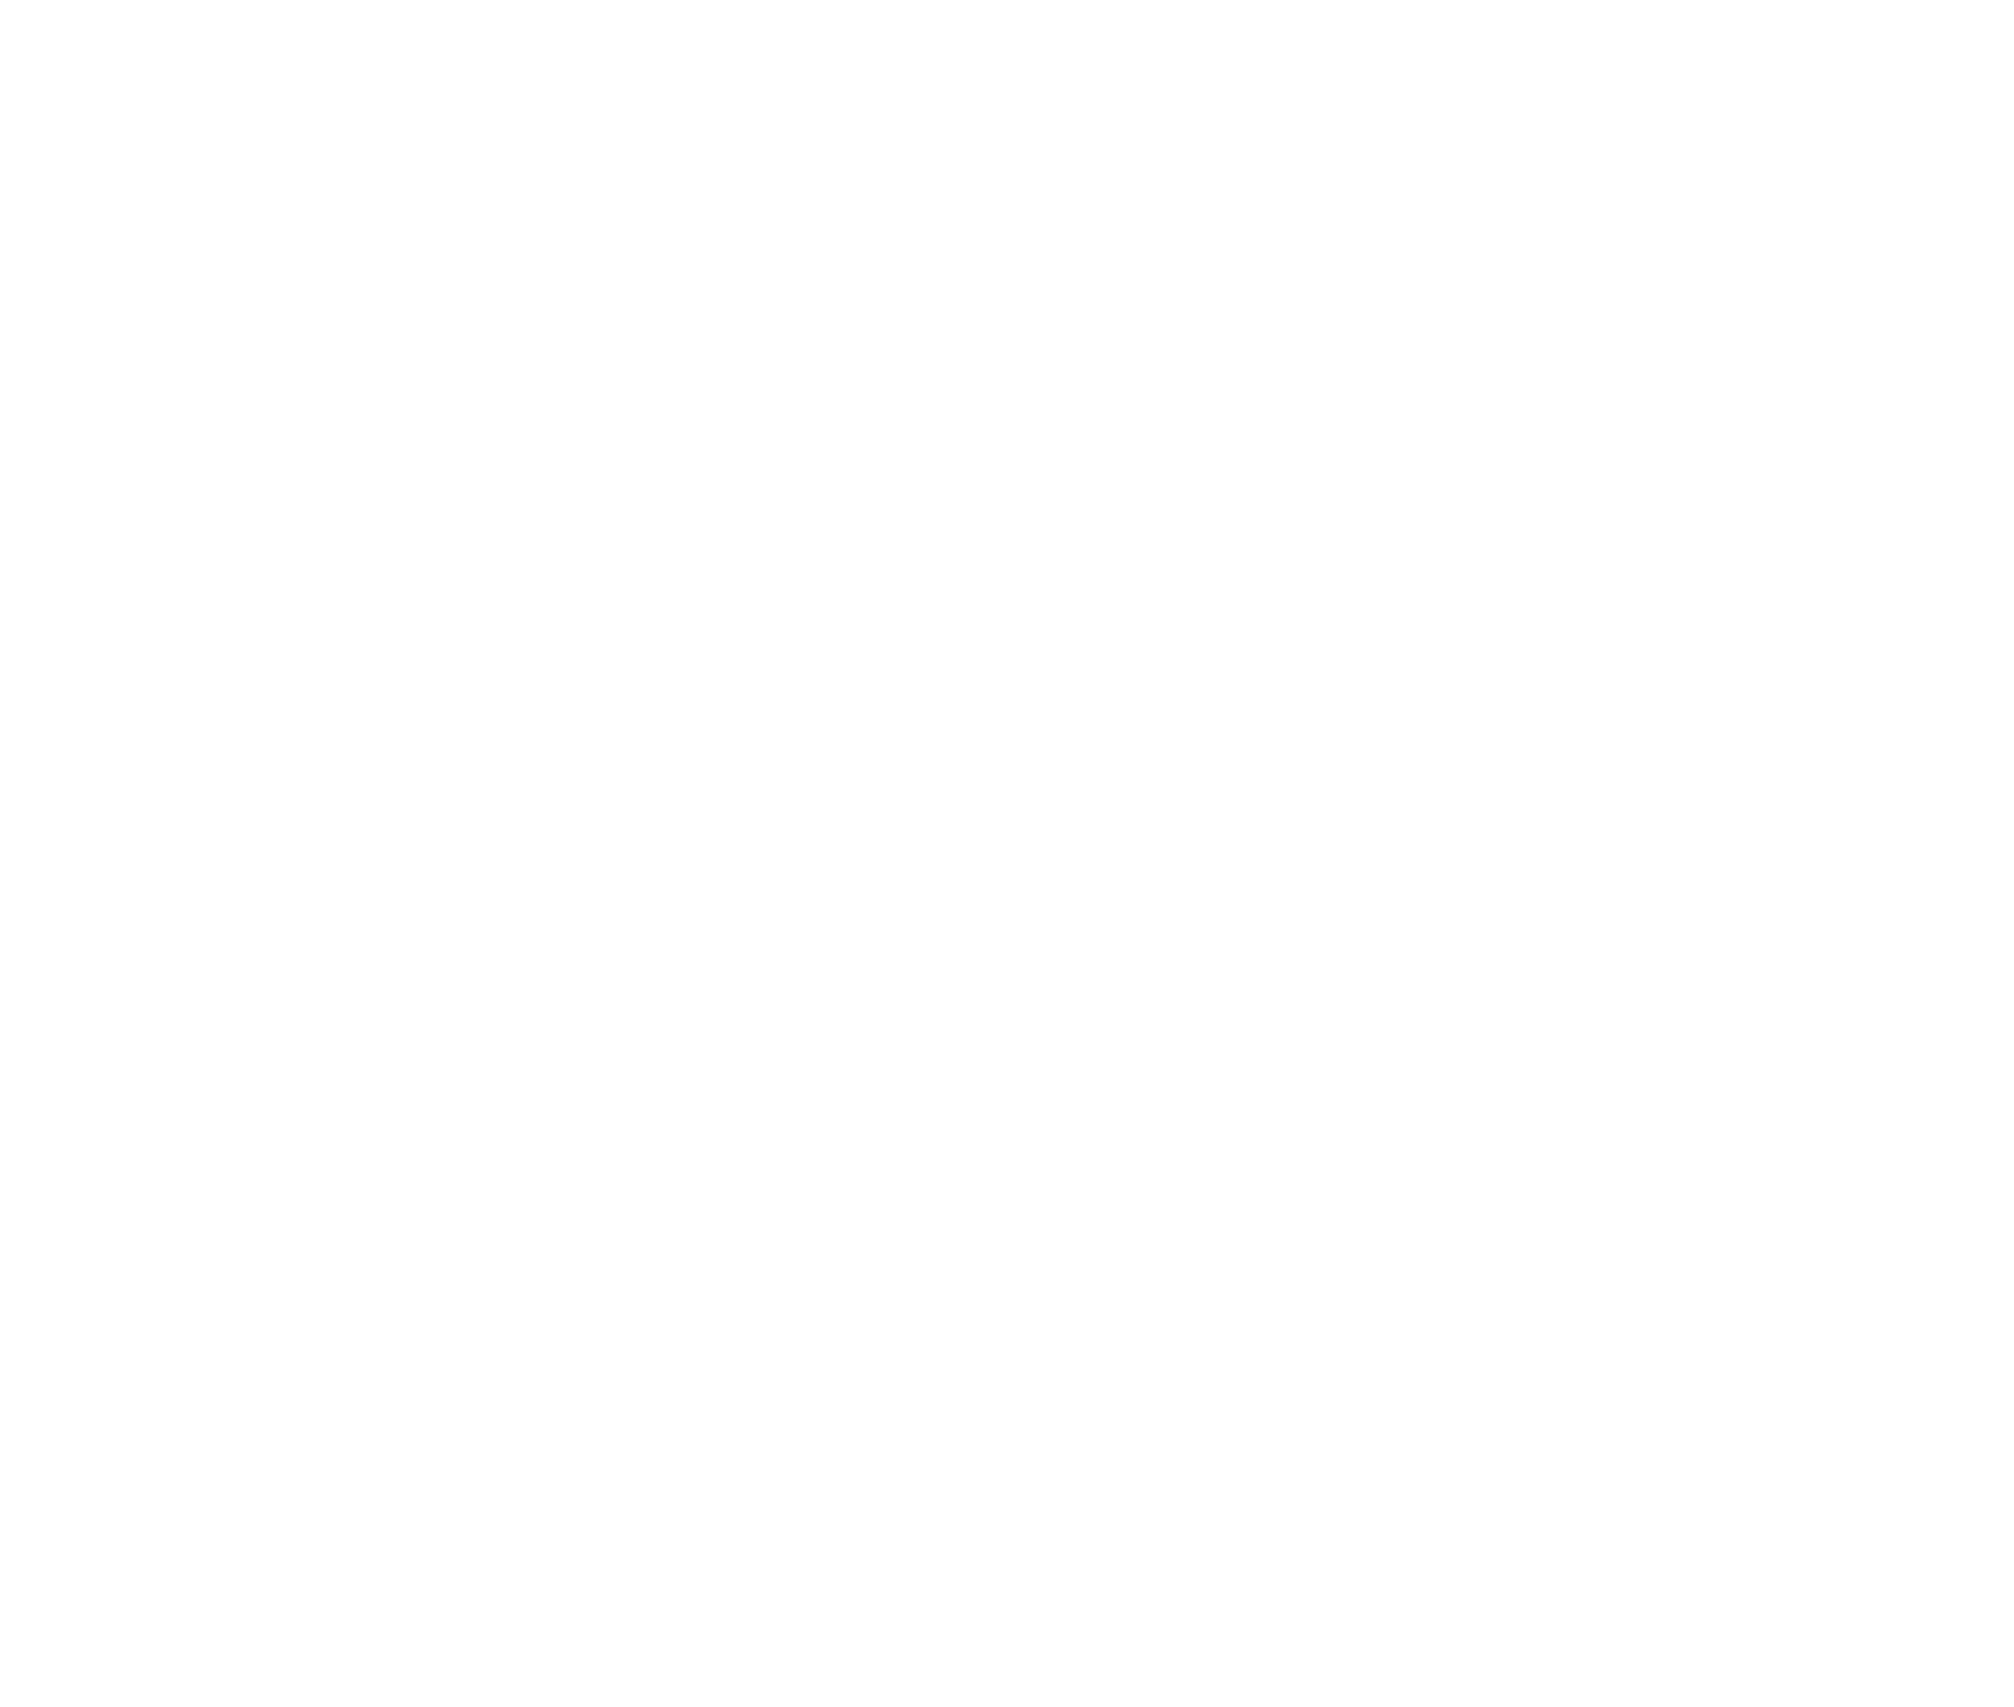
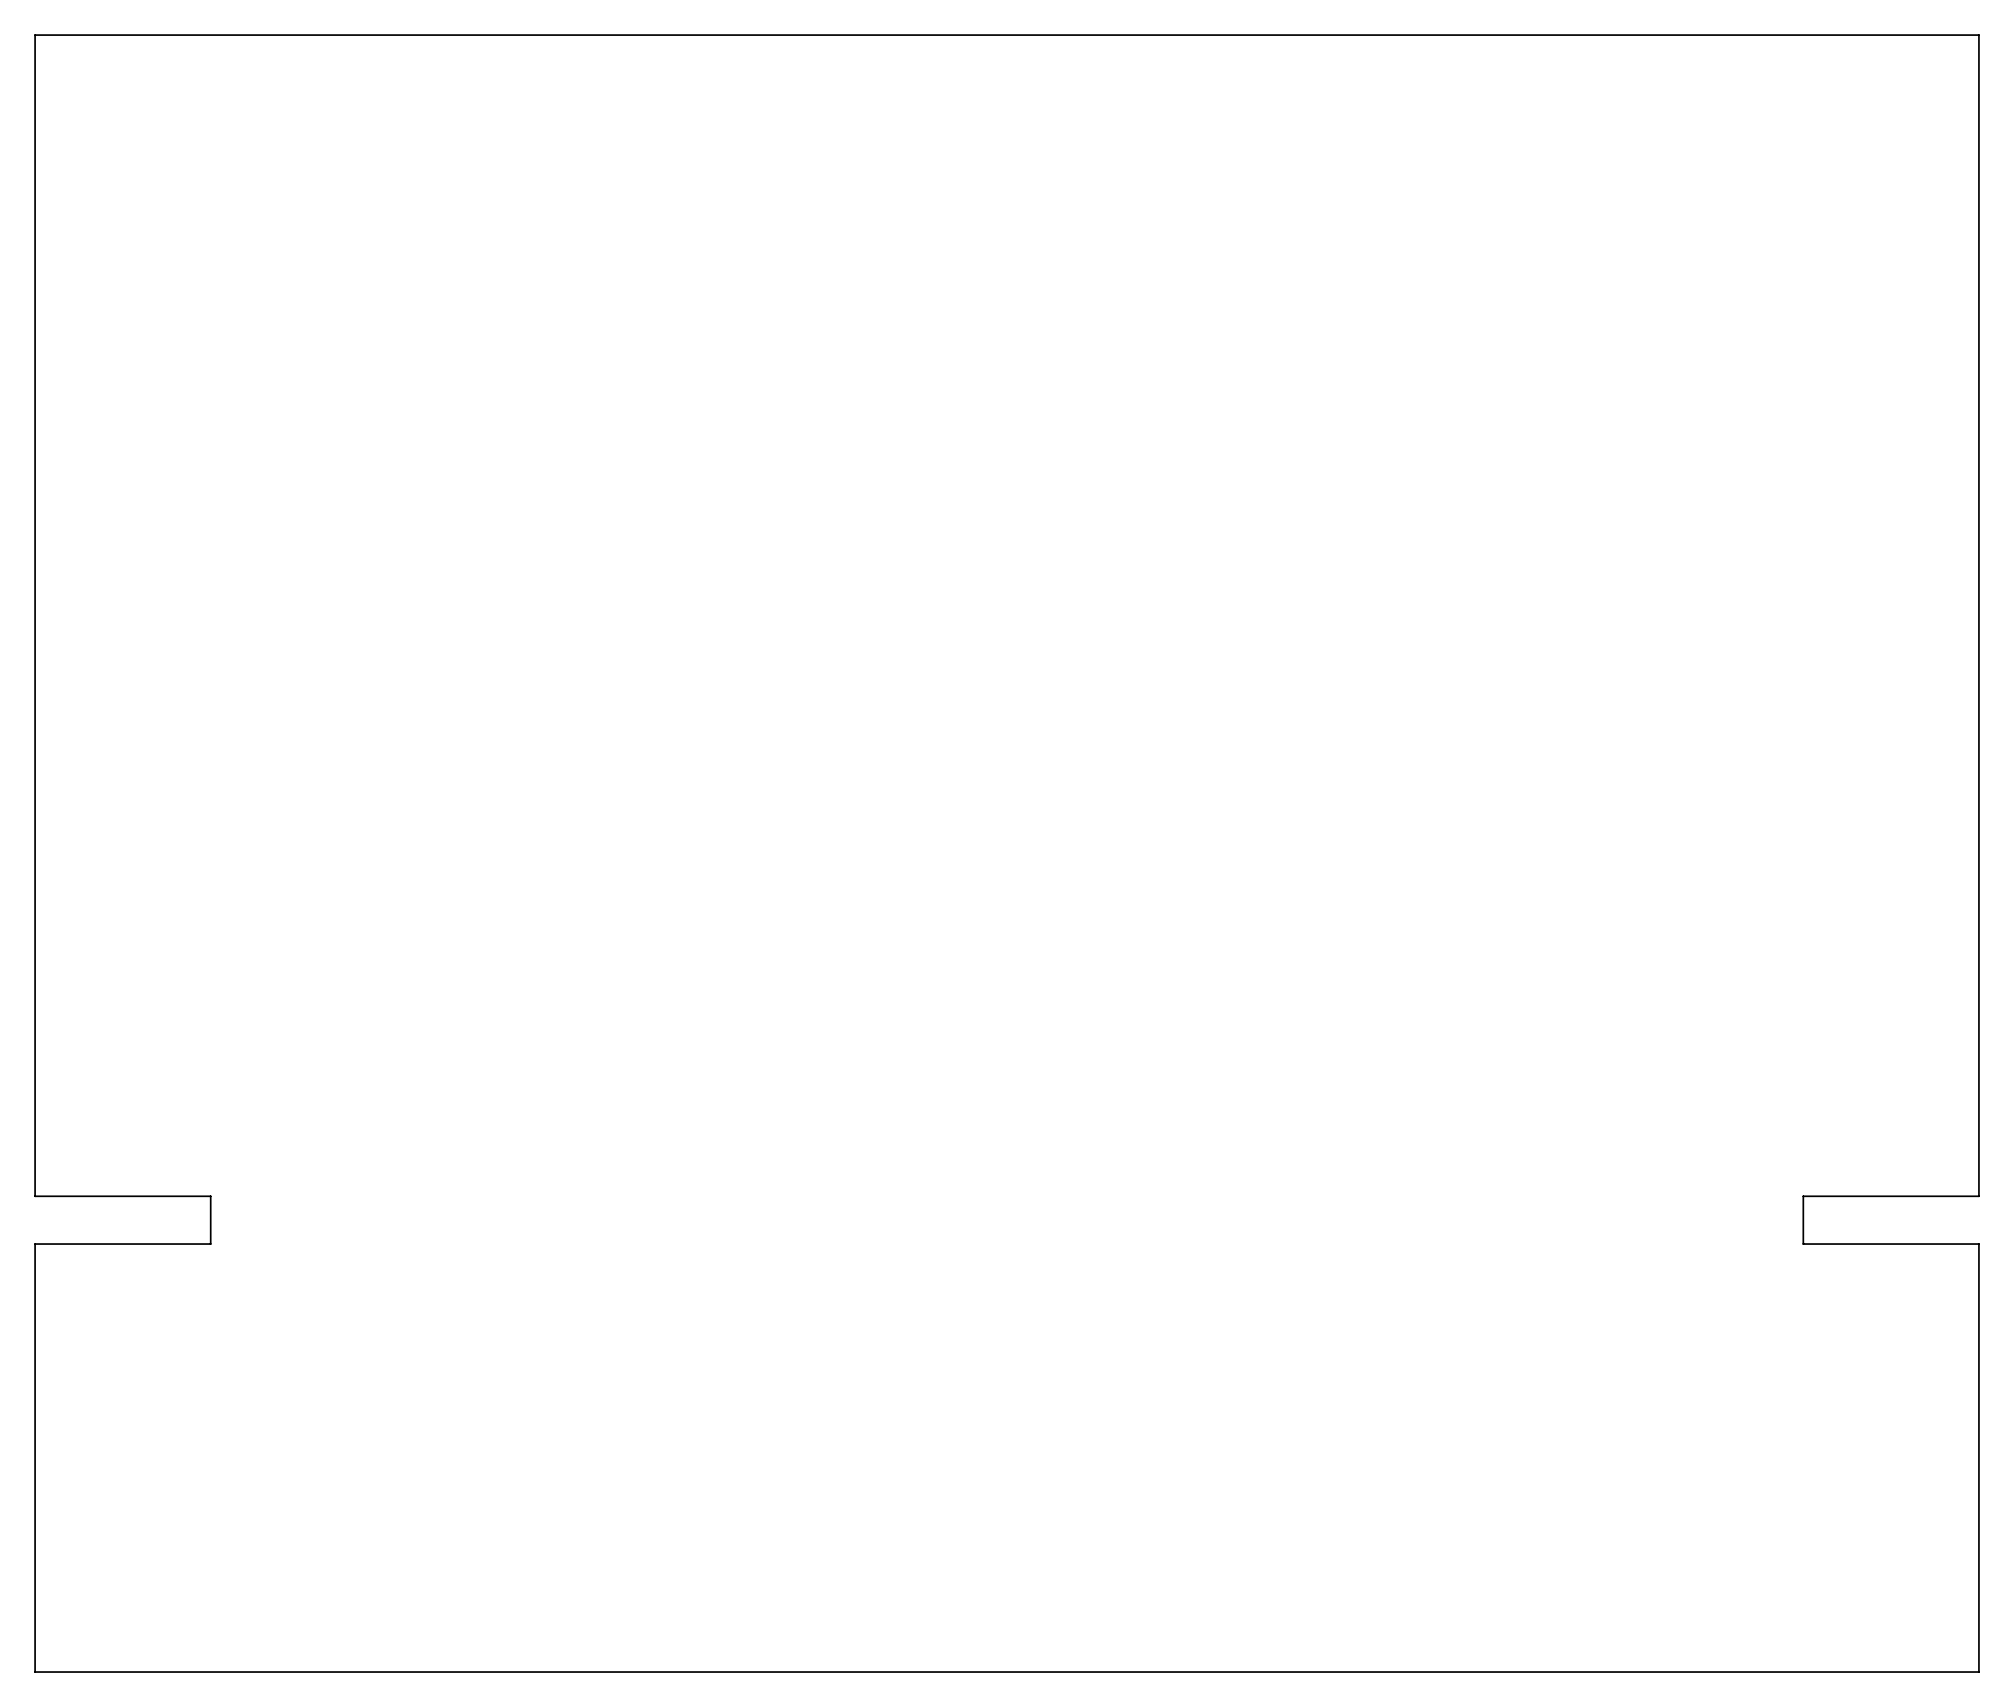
board edge: none -> (1978, 35) (1978, 1196) (1803, 1196) (1803, 1244) (1978, 1244) (1978, 1672) (35, 1672) (35, 1244) (210, 1244) (210, 1196) (35, 1196) (35, 35) (1978, 35)

